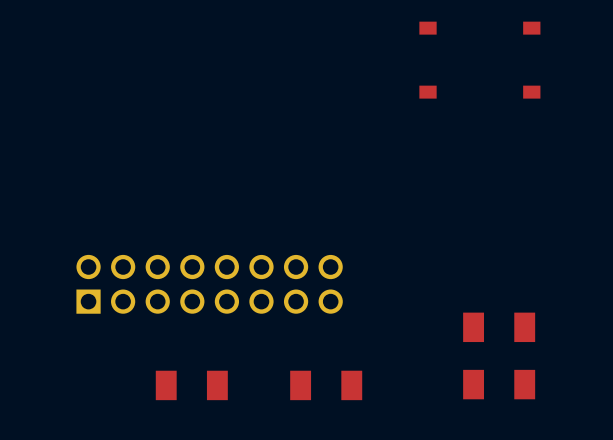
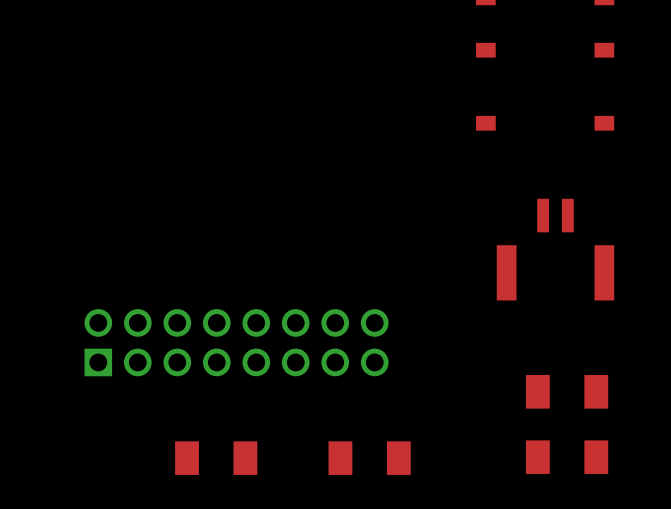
part: none -> (555, 249)

